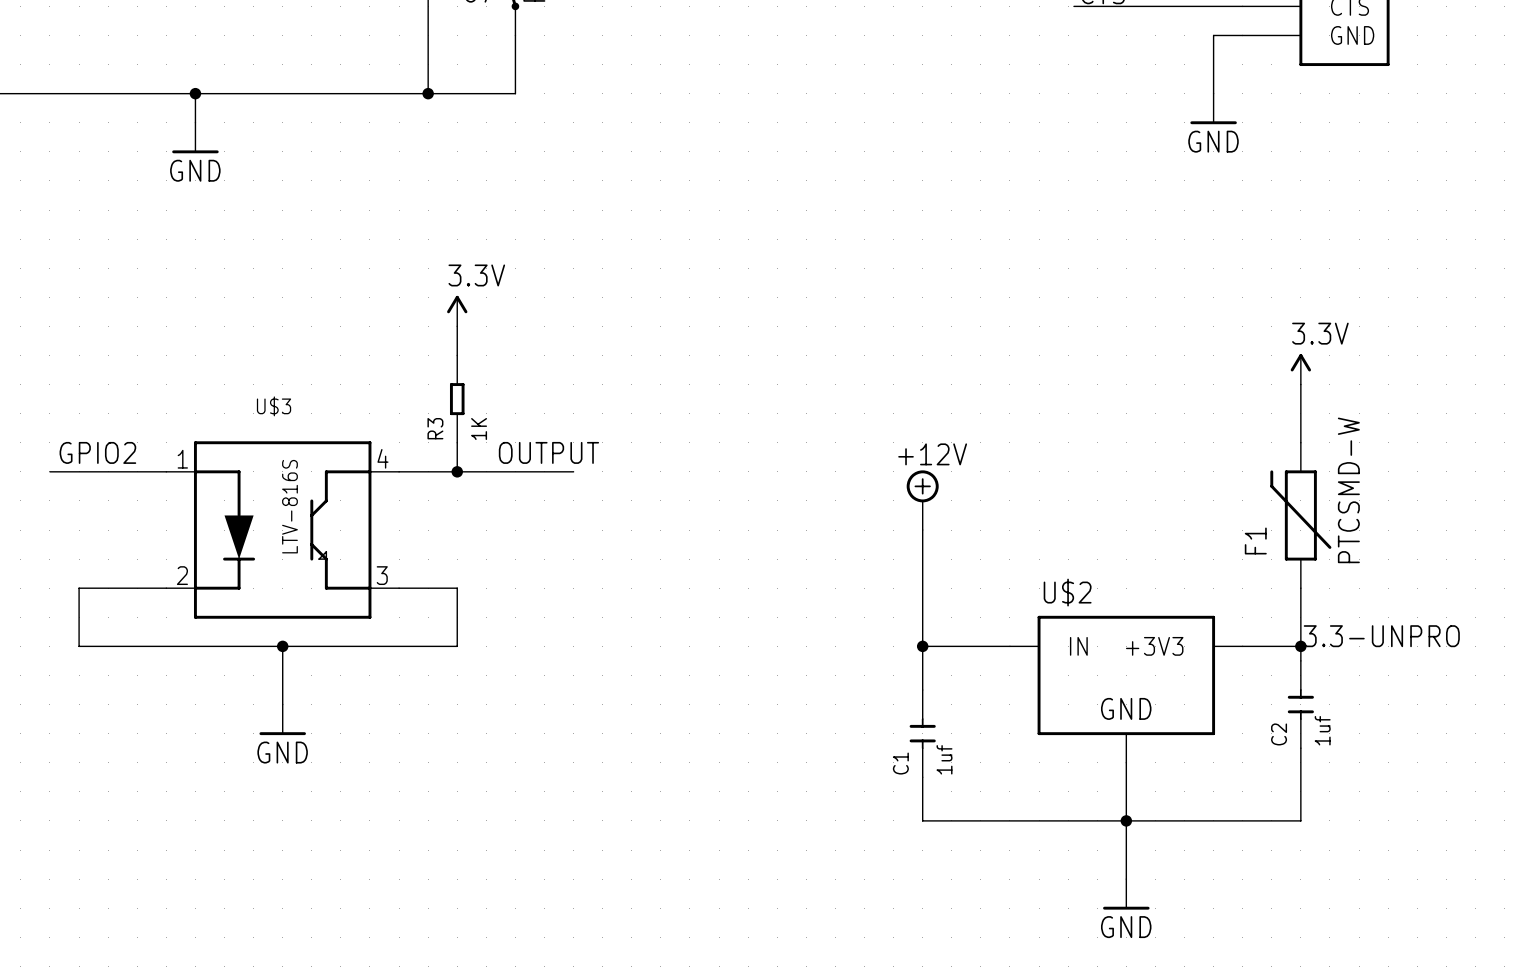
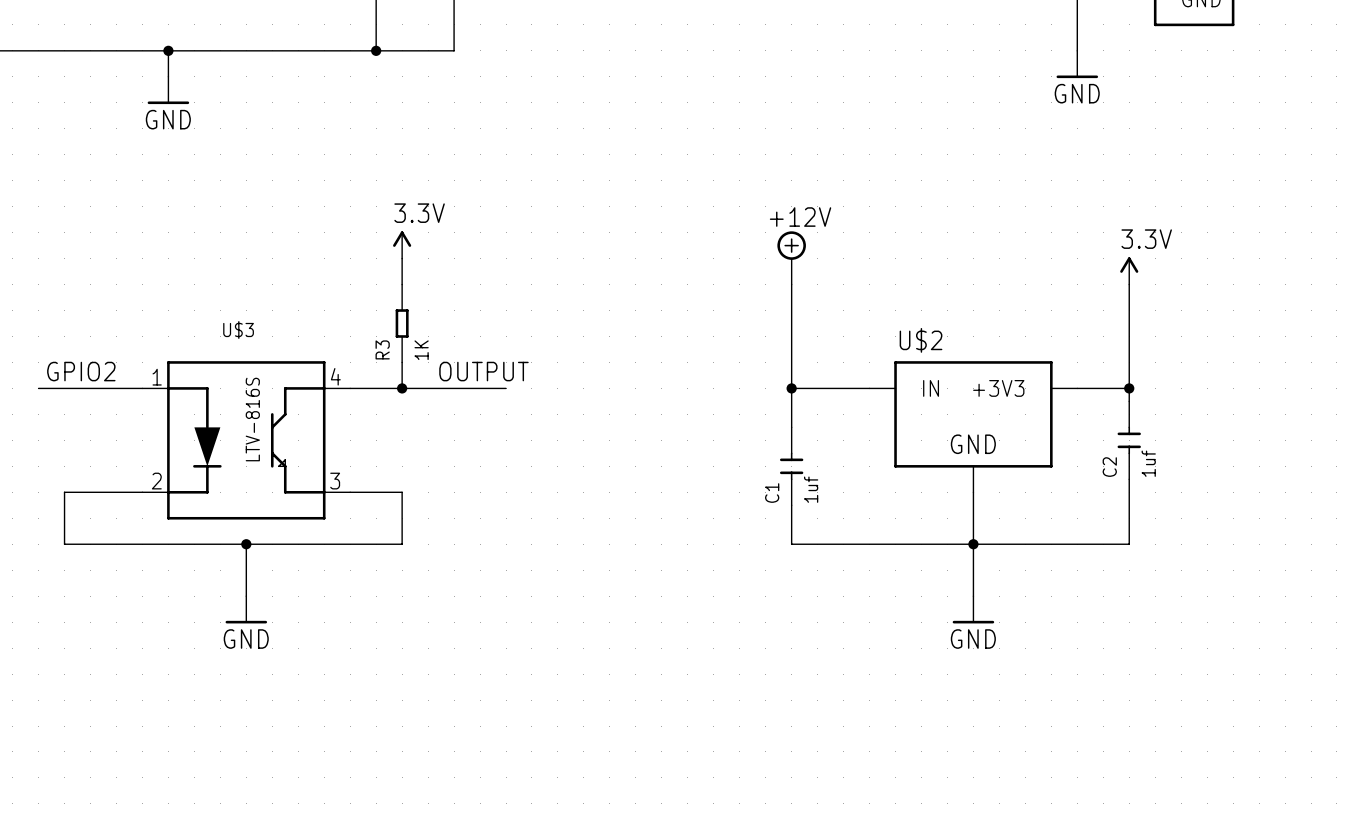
wire: none -> (1129, 284) (1129, 401)
power symbol position: 3.3V (1300, 369) -> 3.3V (1129, 270)
wire: (1300, 384) (1300, 442) -> none
wire: none -> (791, 388) (869, 388)
junction: none -> (791, 388)
wire: none -> (1077, 388) (1129, 388)
junction: none -> (1129, 388)
power symbol position: +12V (922, 500) -> +12V (791, 257)
F1: PTCSMD-W (1300, 515) -> none
wire: (922, 530) (922, 690) -> (791, 284) (791, 427)
wire: (1300, 588) (1300, 660) -> none
wire: none -> (791, 505) (791, 544) (817, 544)
label: 3.3-UNPRO (1381, 636) -> none
junction: (922, 646) -> none
wire: none -> (895, 544) (1103, 544)
junction: none -> (973, 544)
wire: (1271, 646) (1300, 646) -> (1129, 544) (1129, 479)
junction: (1300, 646) -> none
U$2 position: (1126, 689) -> (973, 426)
C2 position: (1300, 704) -> (1129, 440)
C1 position: (922, 733) -> (791, 466)
wire: (1300, 748) (1300, 820) (922, 820) (922, 777) -> none
wire: (1126, 762) (1126, 879) -> (973, 492) (973, 596)
junction: (1126, 820) -> none
power symbol position: GND (1126, 894) -> GND (973, 609)

